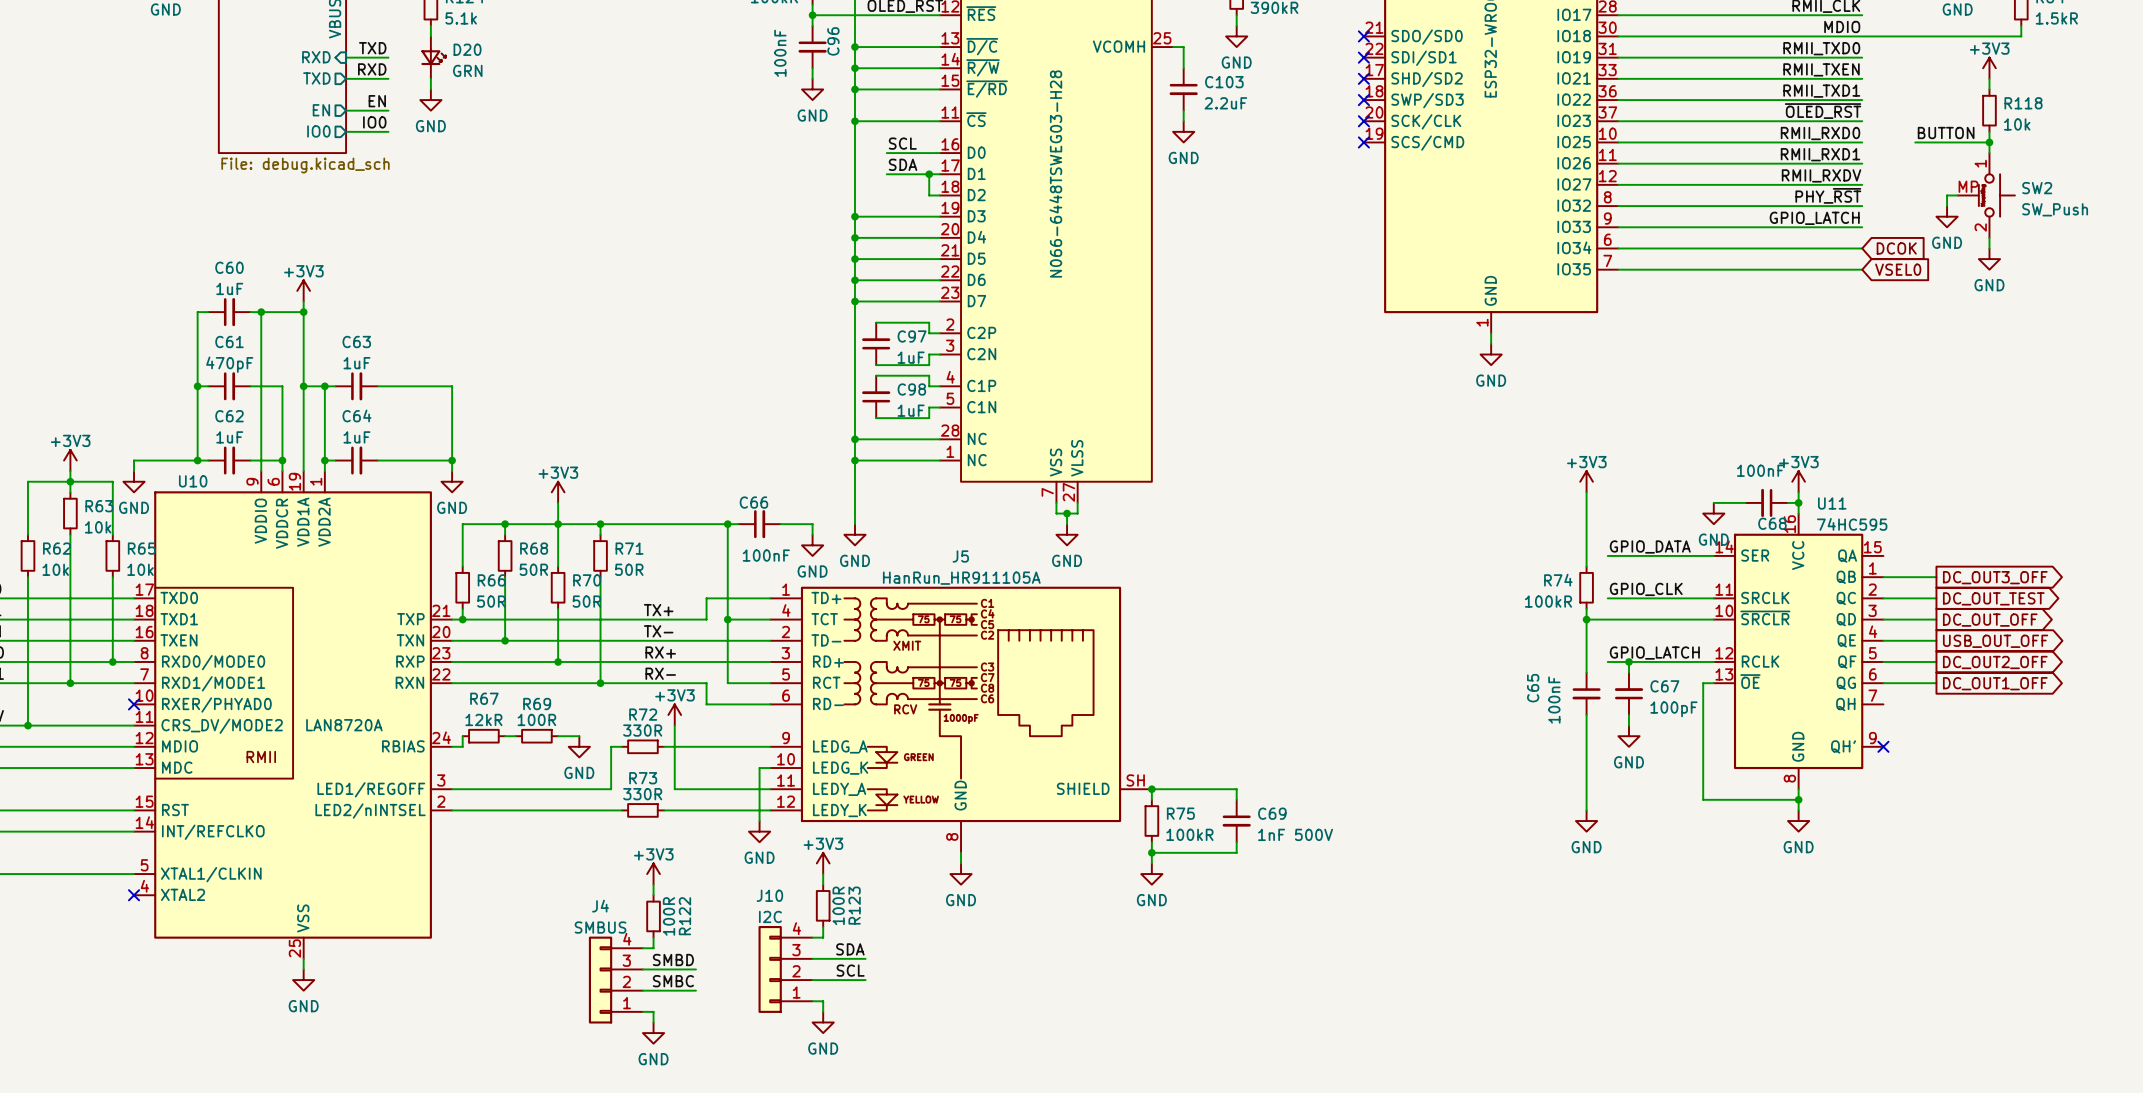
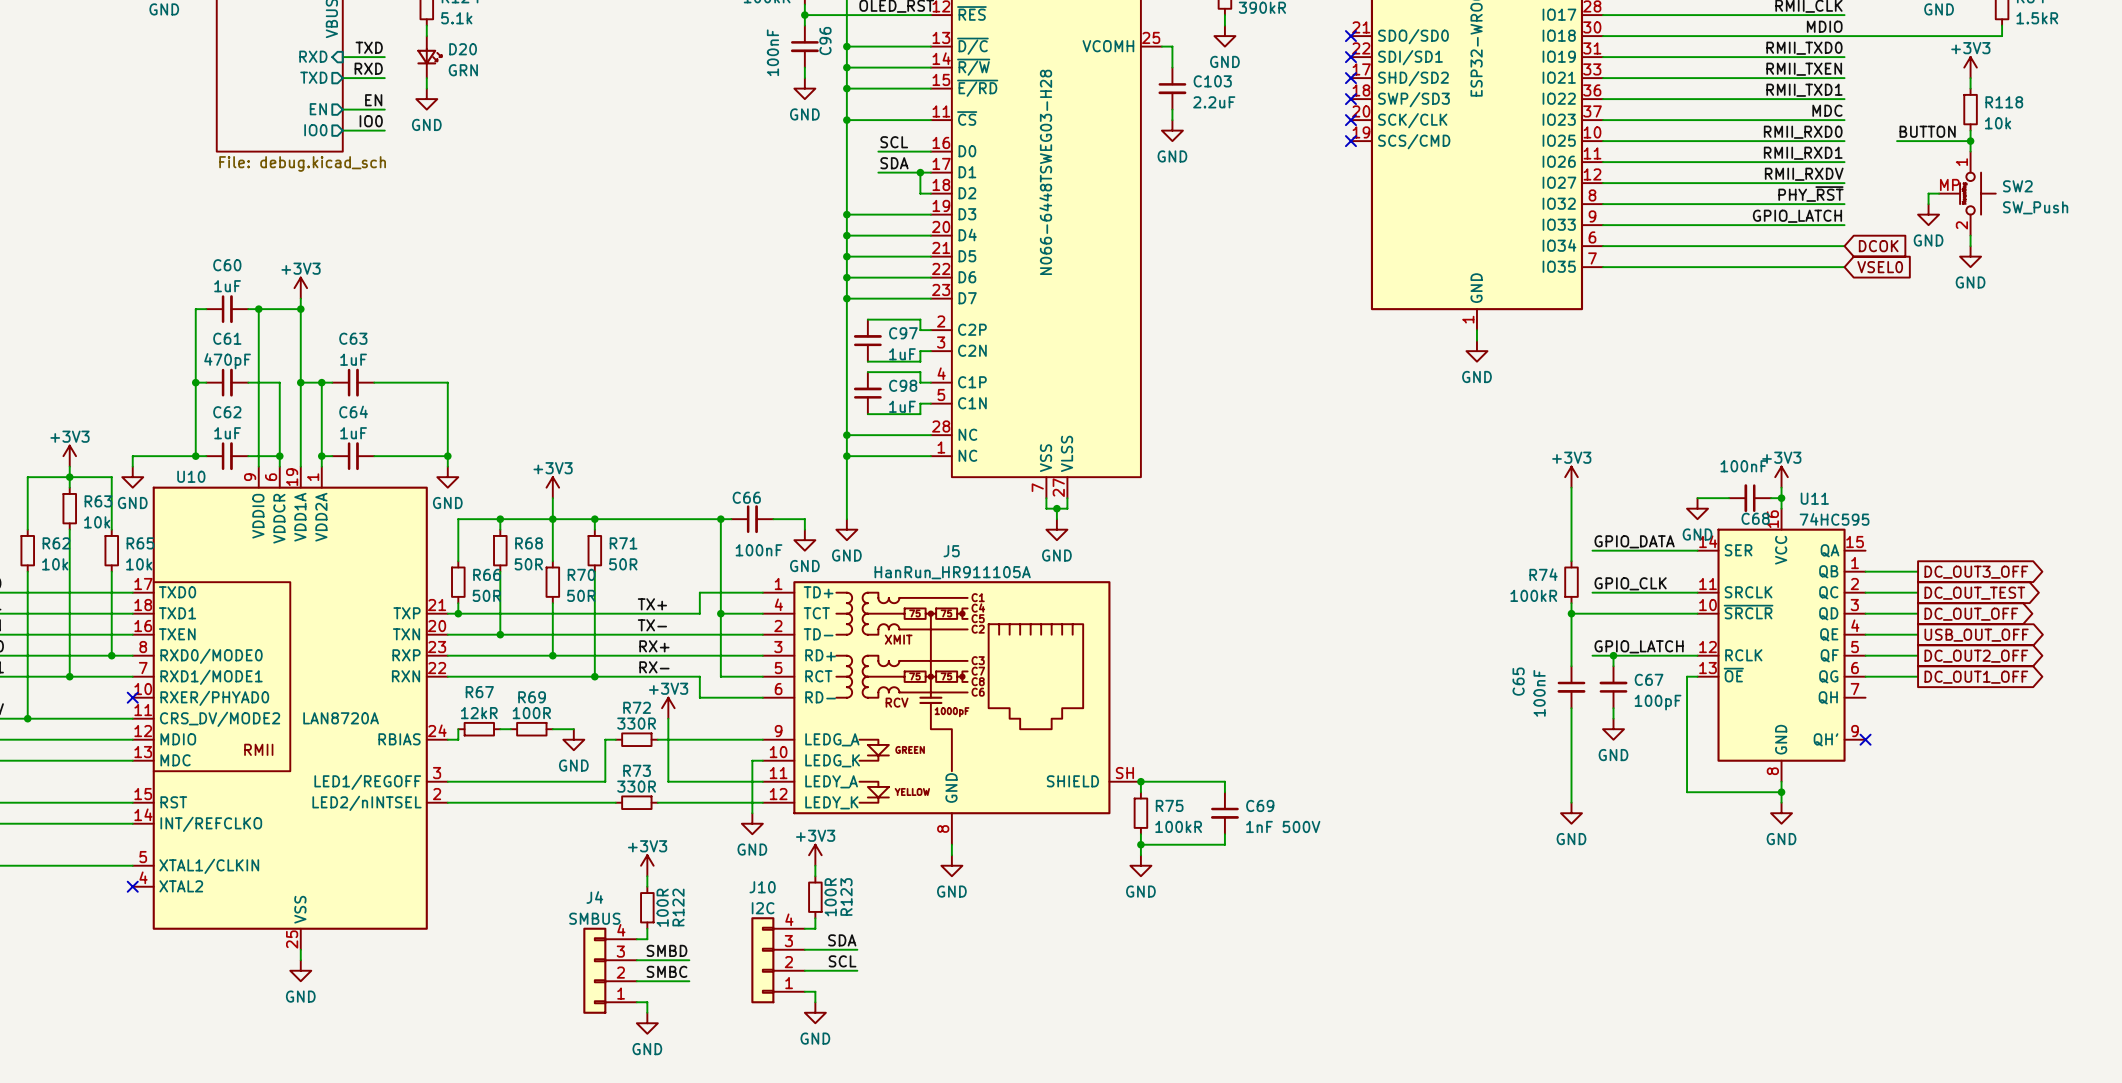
label: ~{OLED_RST} (1823, 111) -> MDC (1827, 110)

